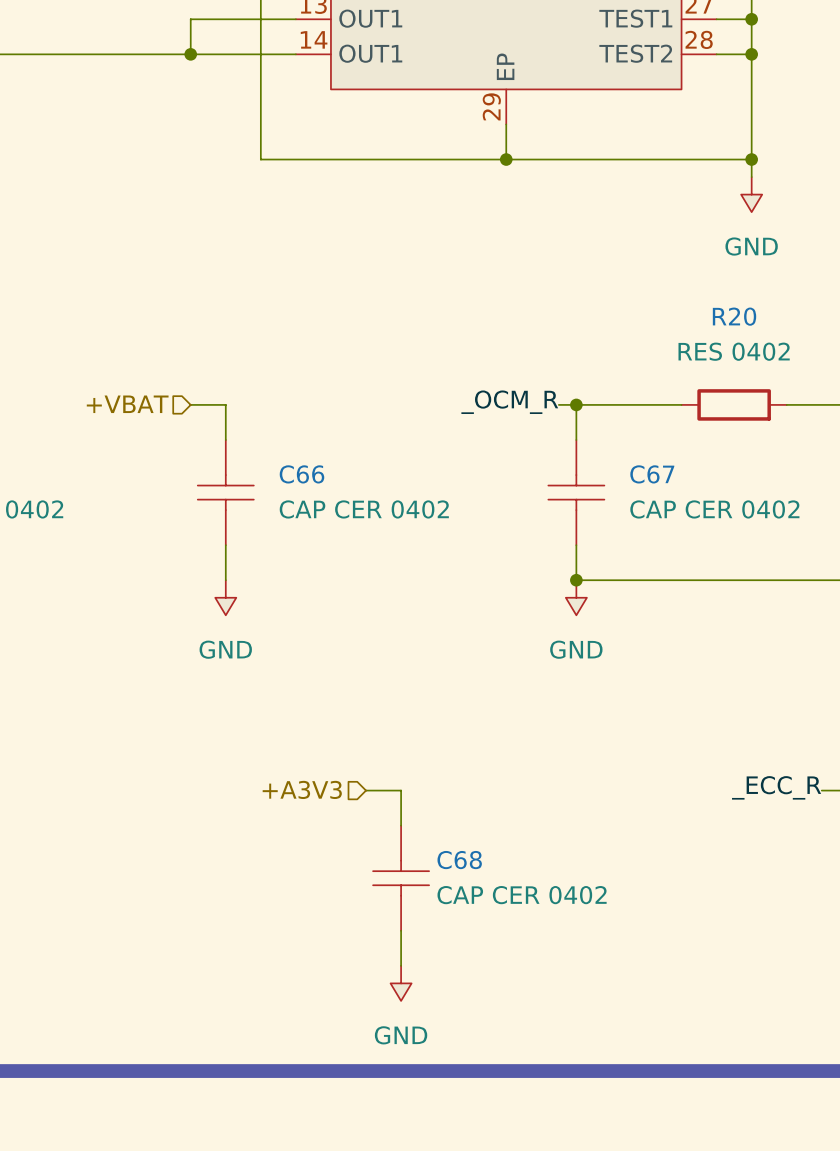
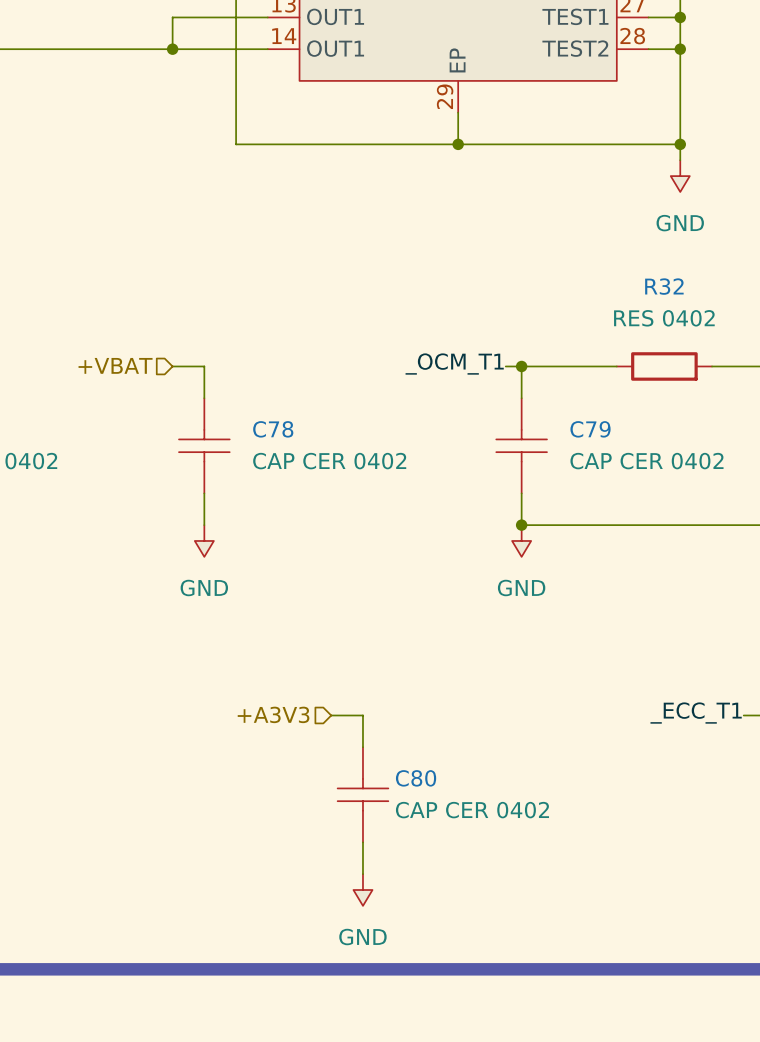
R20 name: R20 (734, 316) -> R32 (664, 286)
label: _OCM_R (509, 402) -> _OCM_T1 (454, 364)
C66 name: C66 (301, 474) -> C78 (273, 429)
C67 name: C67 (652, 474) -> C79 (590, 429)
label: _ECC_R (776, 787) -> _ECC_T1 (696, 713)
C68 name: C68 (459, 860) -> C80 (416, 778)

